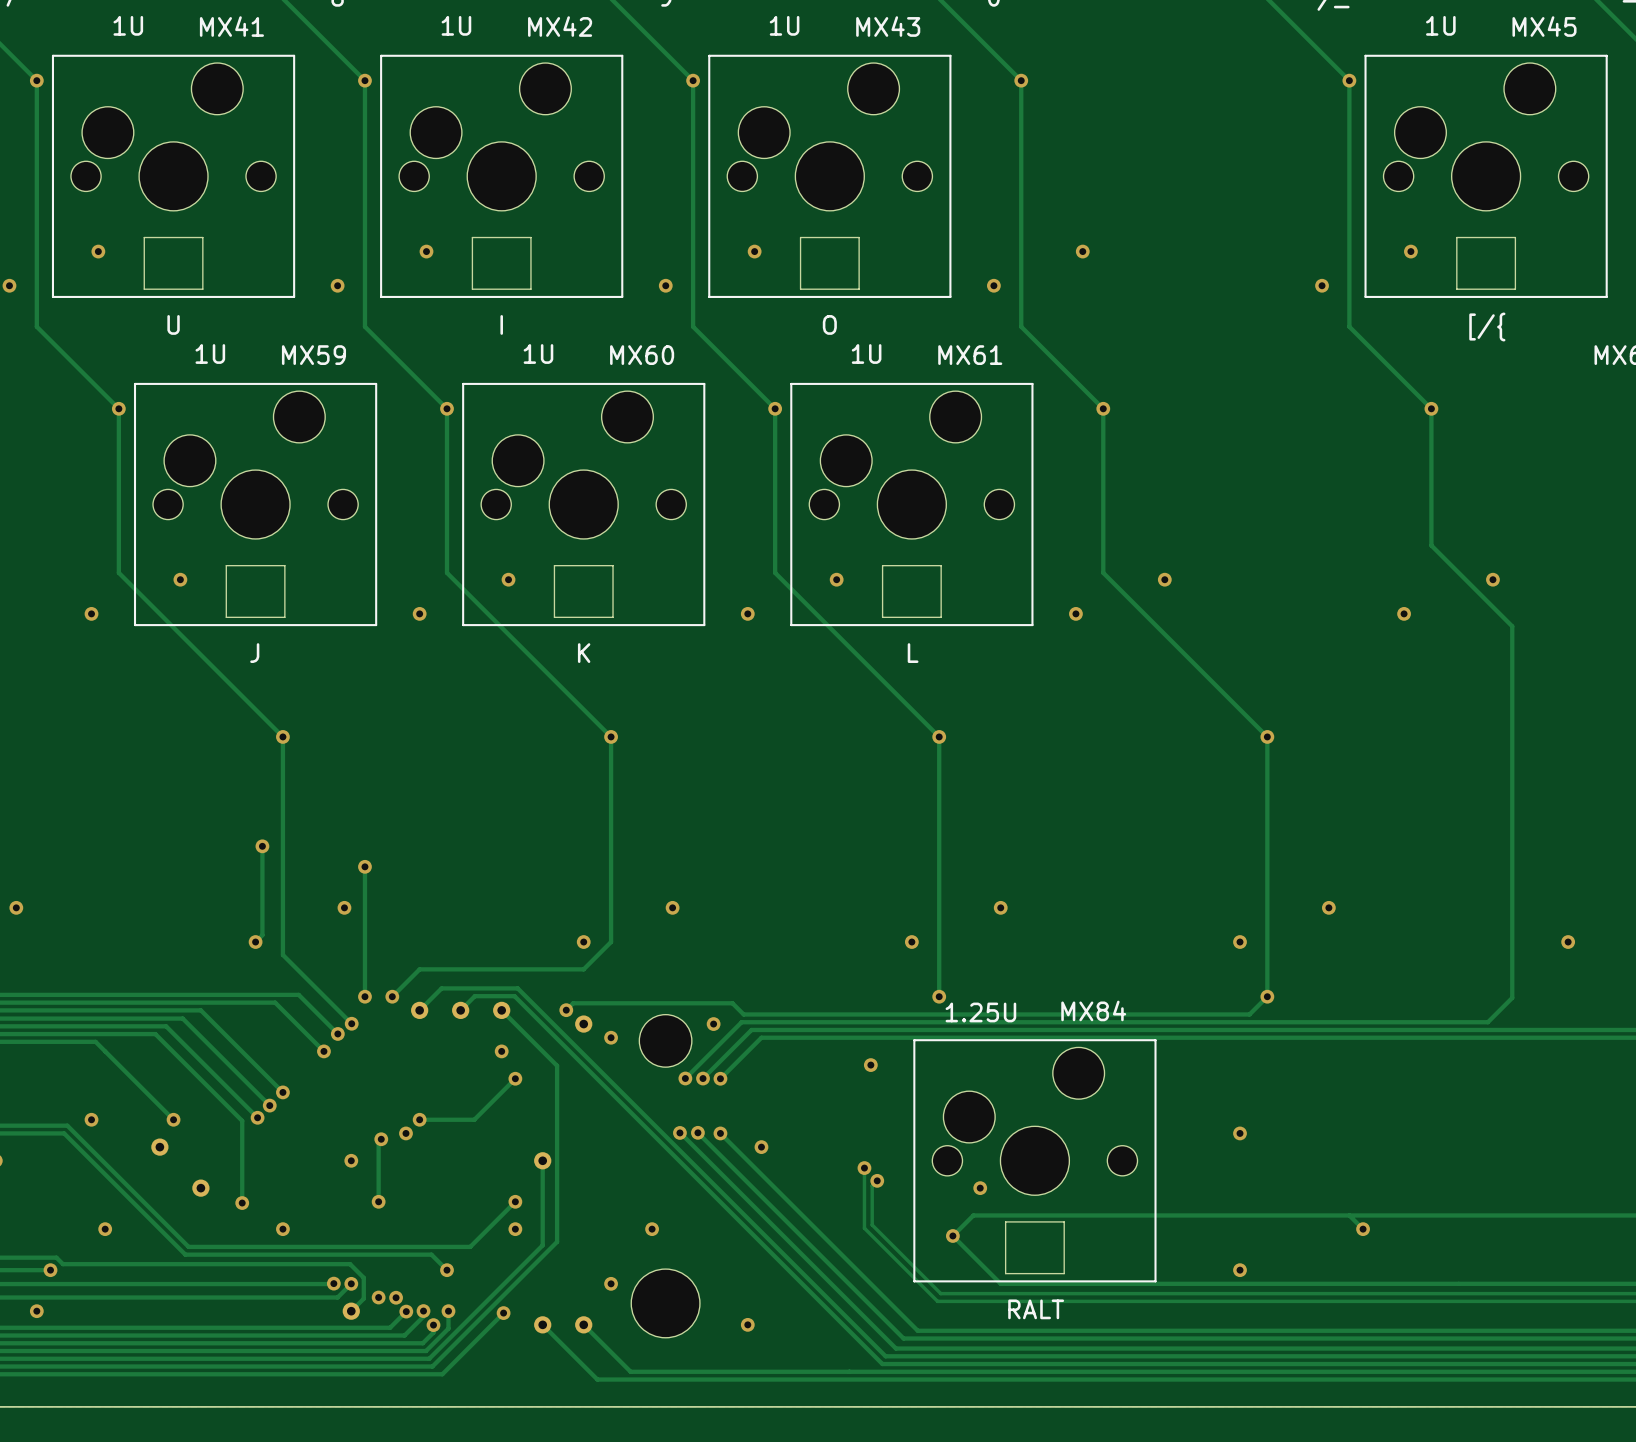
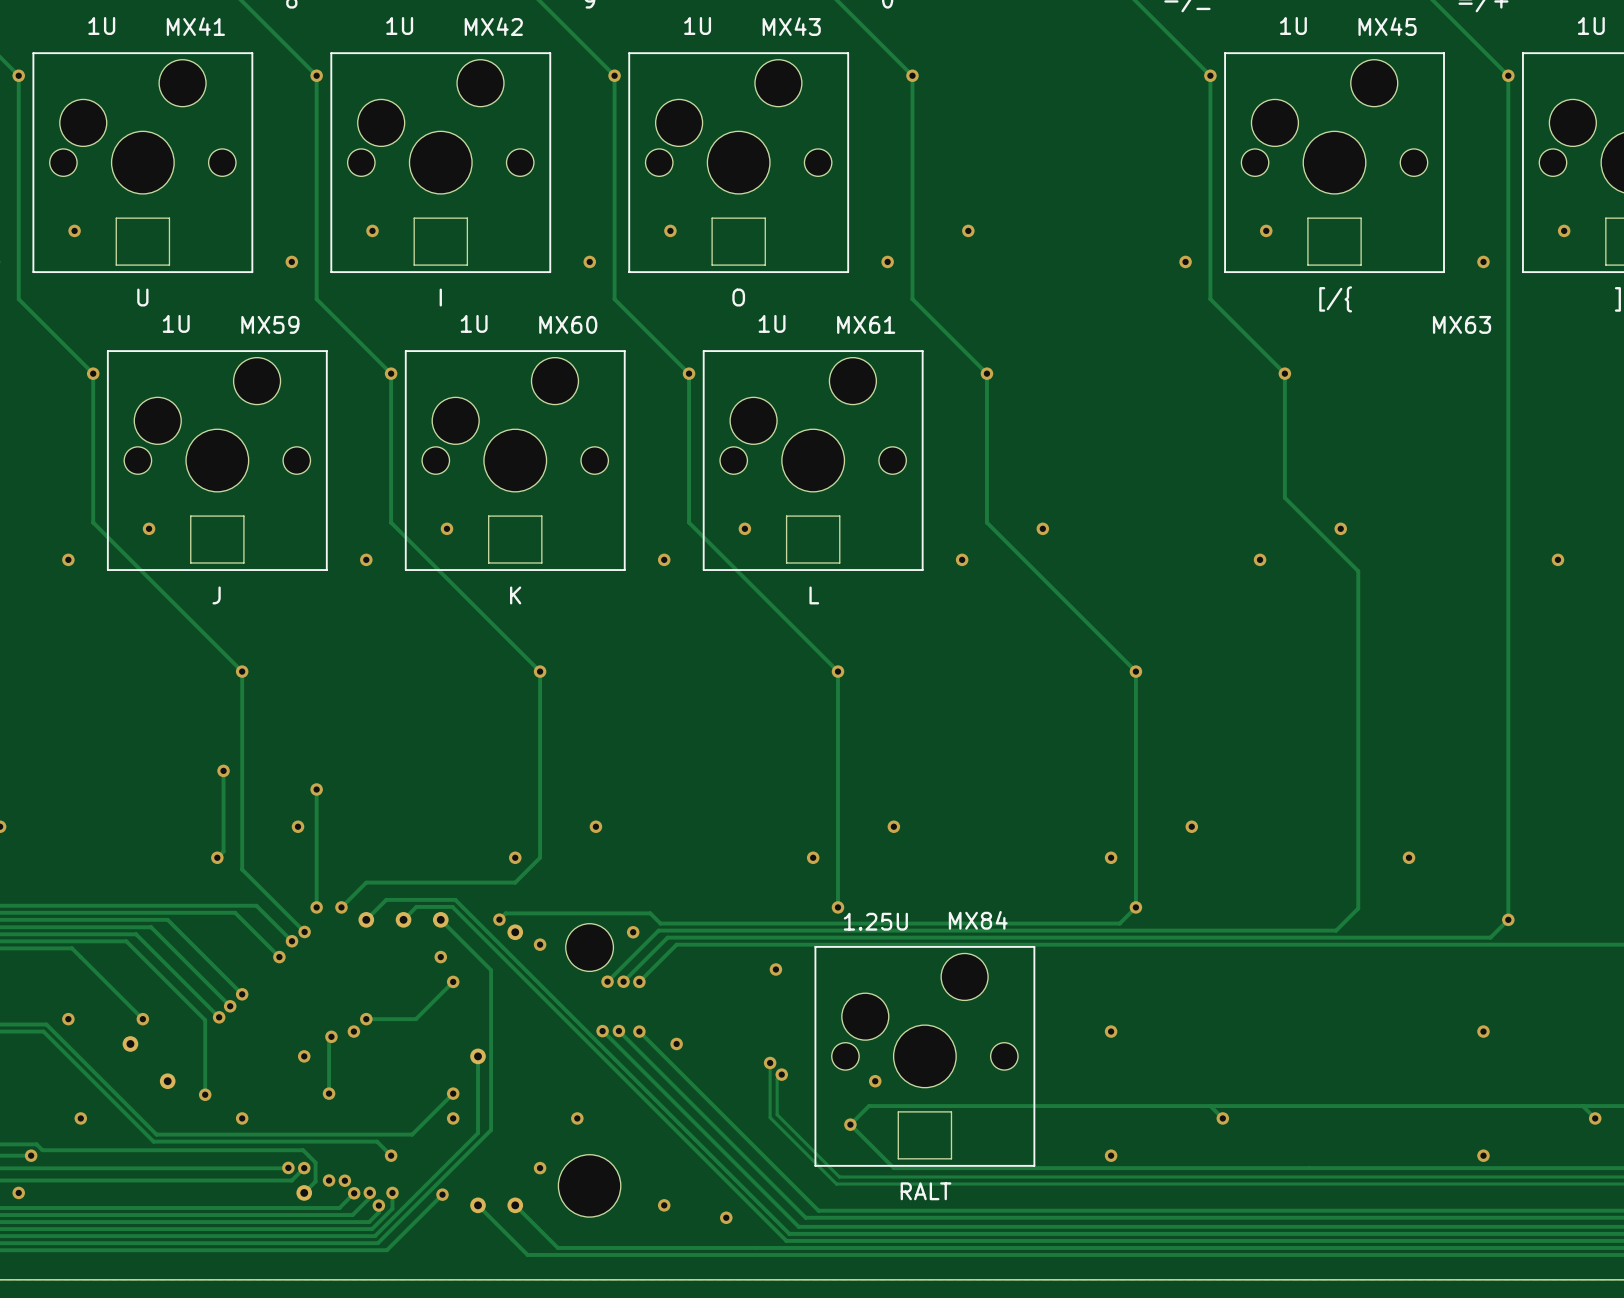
via: none -> (726, 1217)

